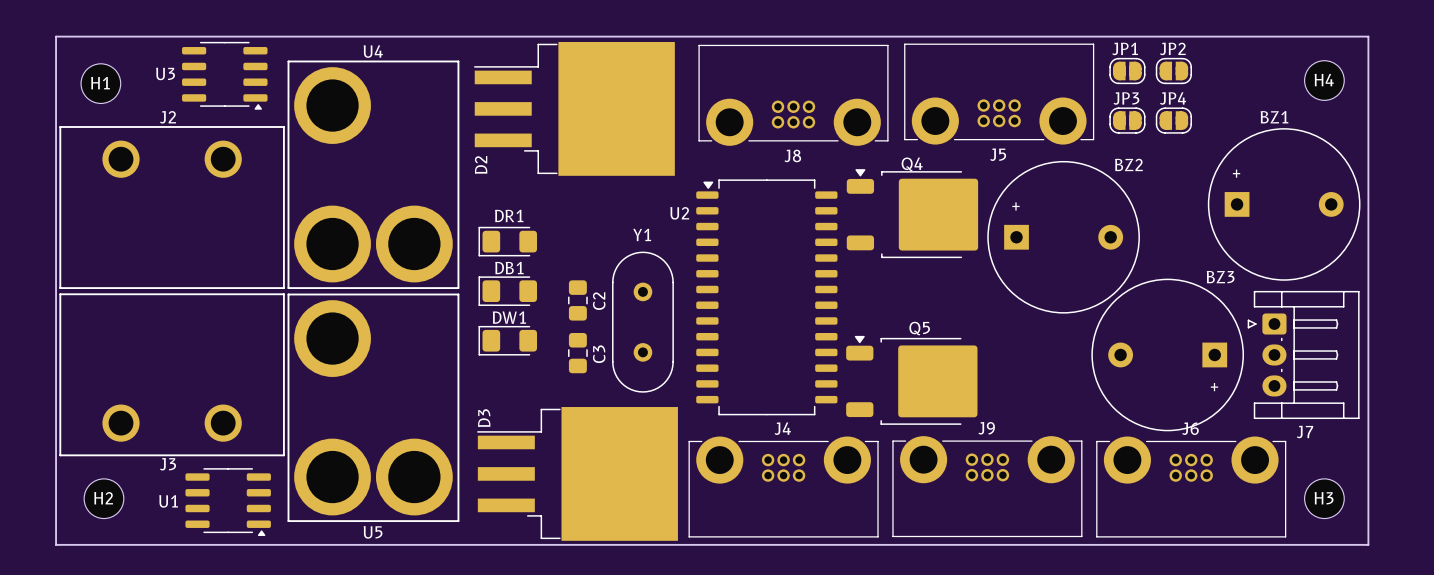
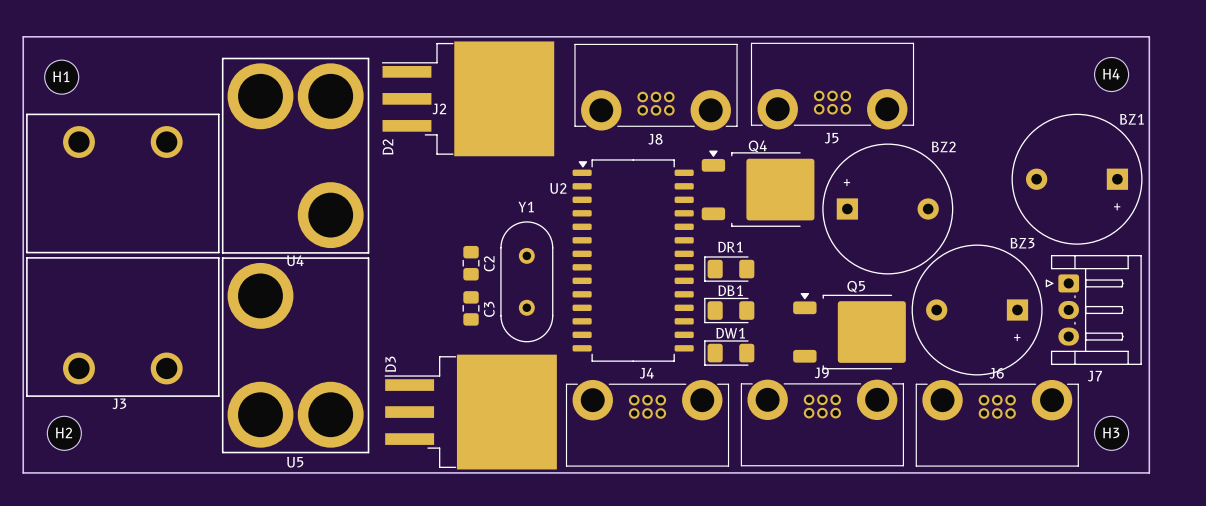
JP1: (1127, 71) -> none
JP2: (1173, 71) -> none
U3: (224, 75) -> none
J2 name position: J2 (168, 117) -> J2 (439, 108)
BZ1 name position: BZ1 (1274, 117) -> BZ1 (1131, 119)
JP3: (1127, 120) -> none
JP4: (1173, 120) -> none
U4 rotation: 0° (373, 174) -> 180° (295, 155)
BZ1 rotation: 0° (1284, 204) -> 180° (1077, 179)
DR1 position: (507, 241) -> (729, 269)
DB1 position: (507, 291) -> (729, 310)
DW1 position: (507, 340) -> (729, 353)
Q5 position: (911, 380) -> (849, 331)
U1: (228, 502) -> none

